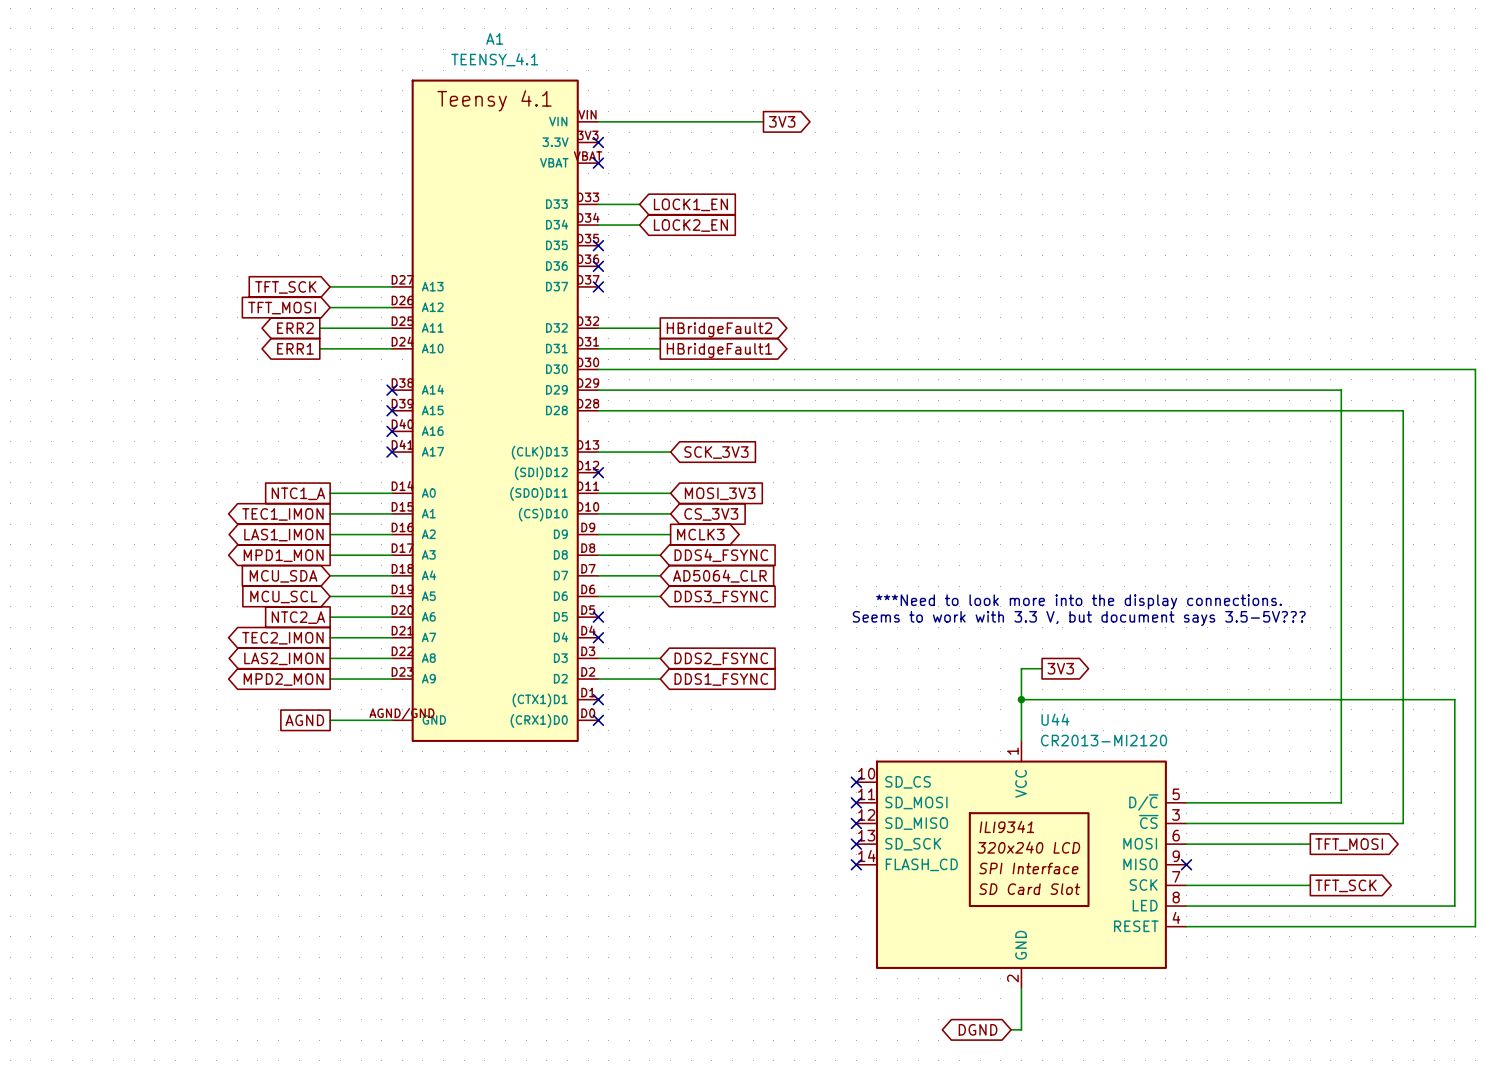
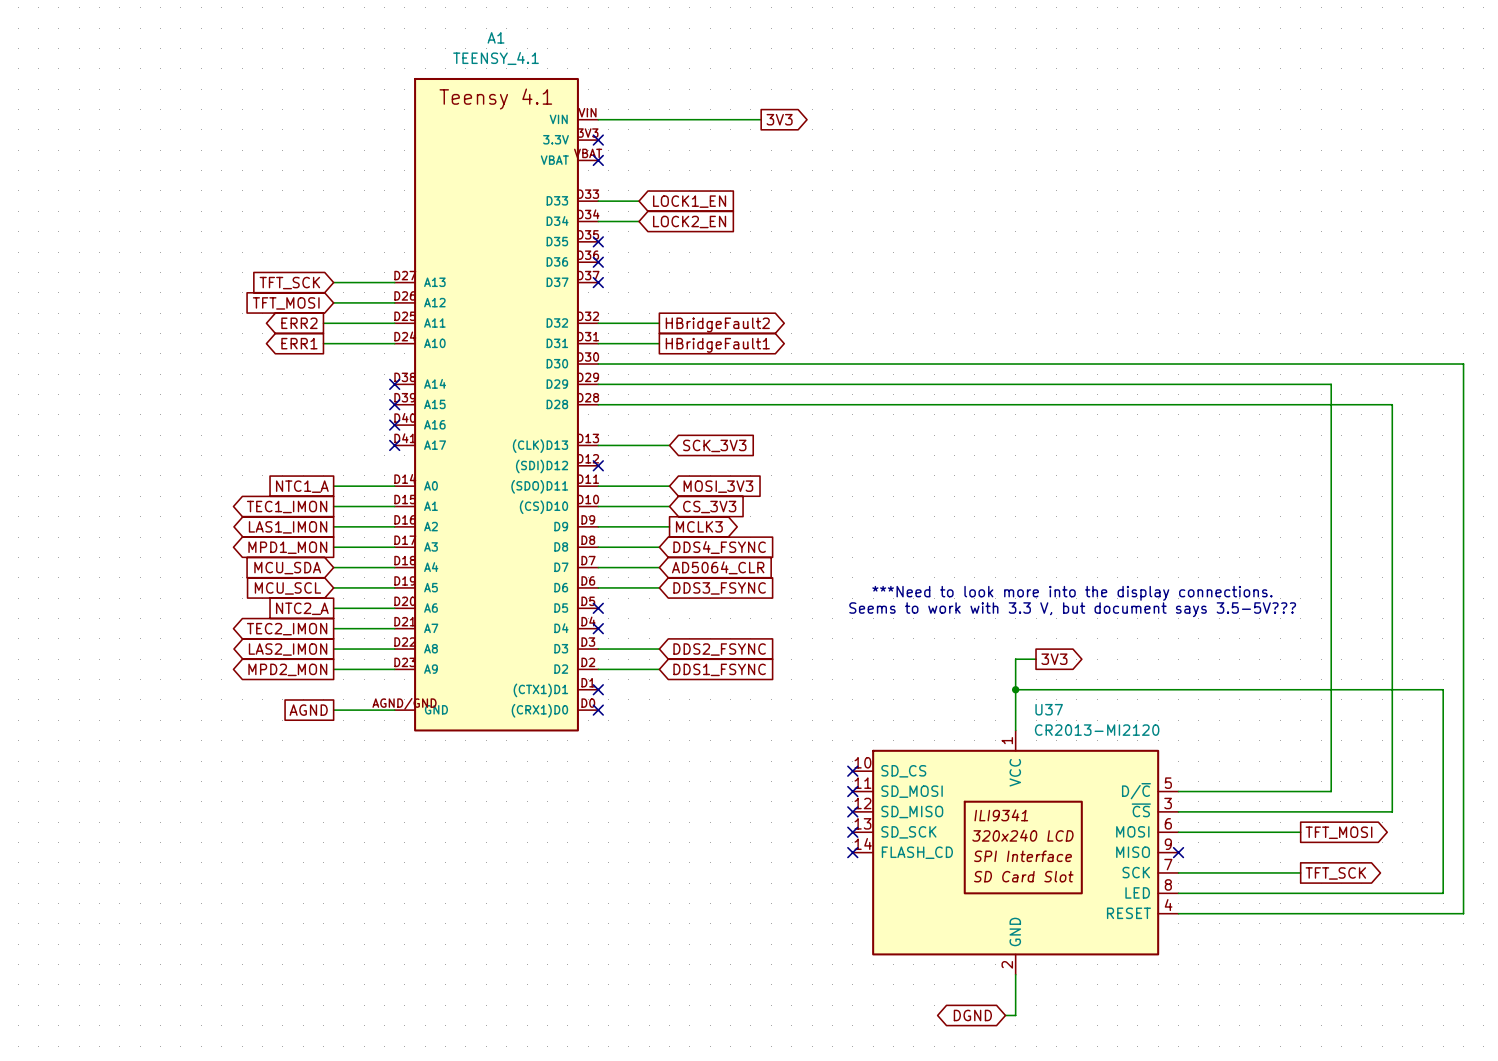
U44 name: U44 (1055, 719) -> U37 (1049, 709)

